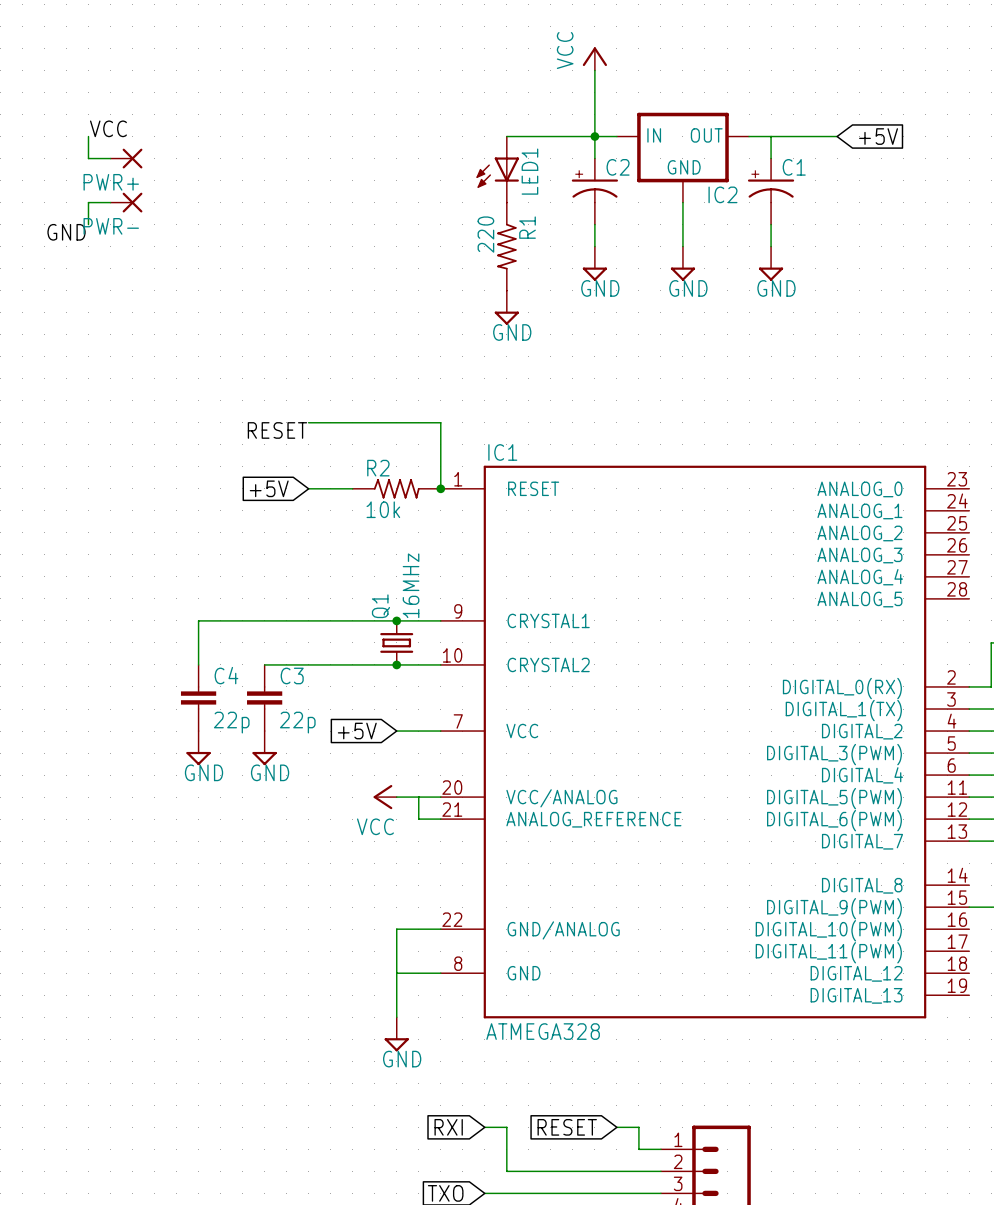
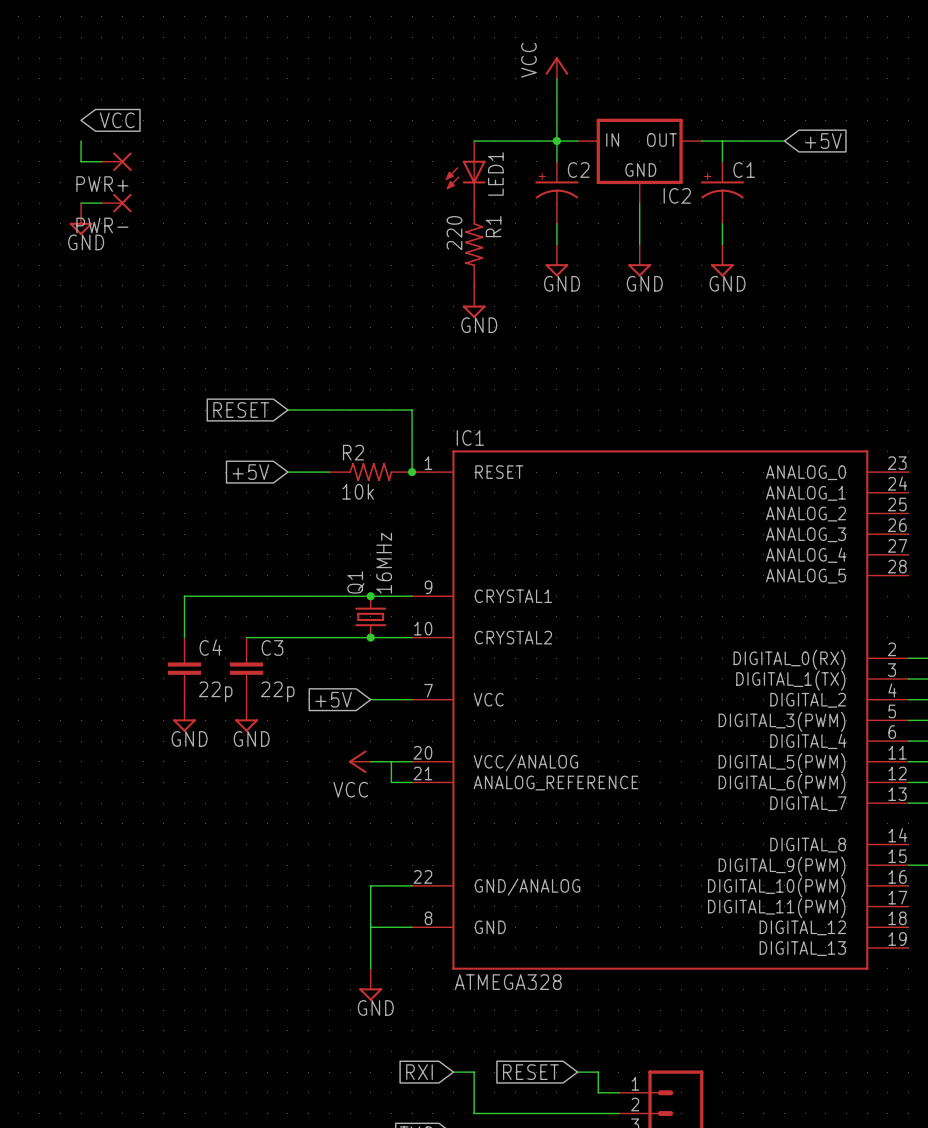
global label: none -> VCC (117, 120)
label: VCC (108, 128) -> none
power symbol: none -> GND (81, 219)
label: GND (66, 232) -> none
global label: none -> RESET (241, 410)
label: RESET (277, 430) -> none

